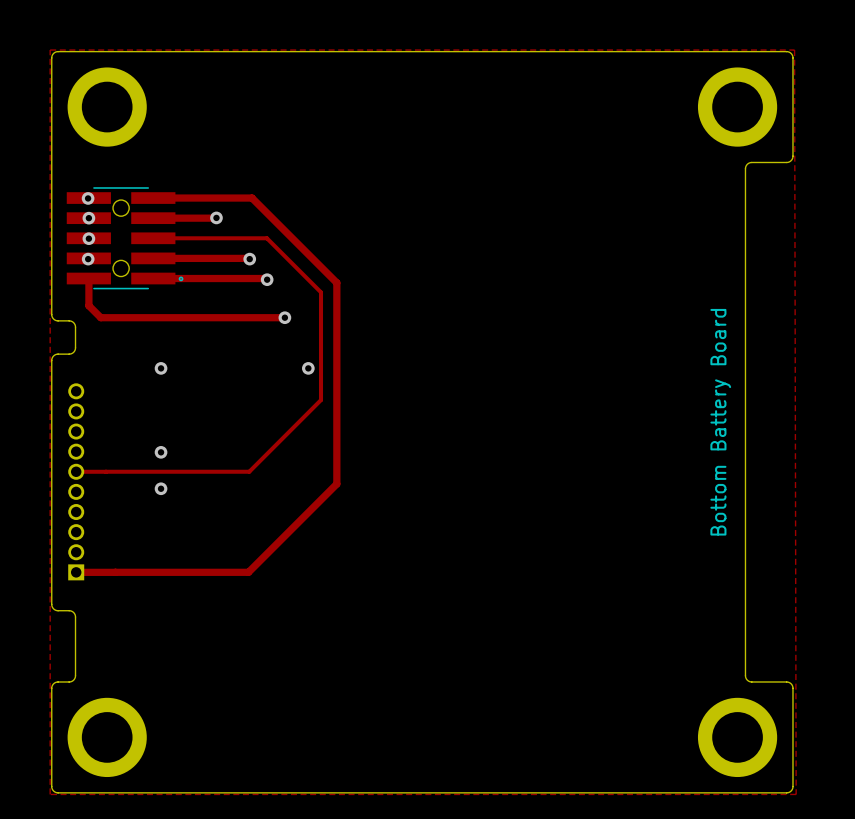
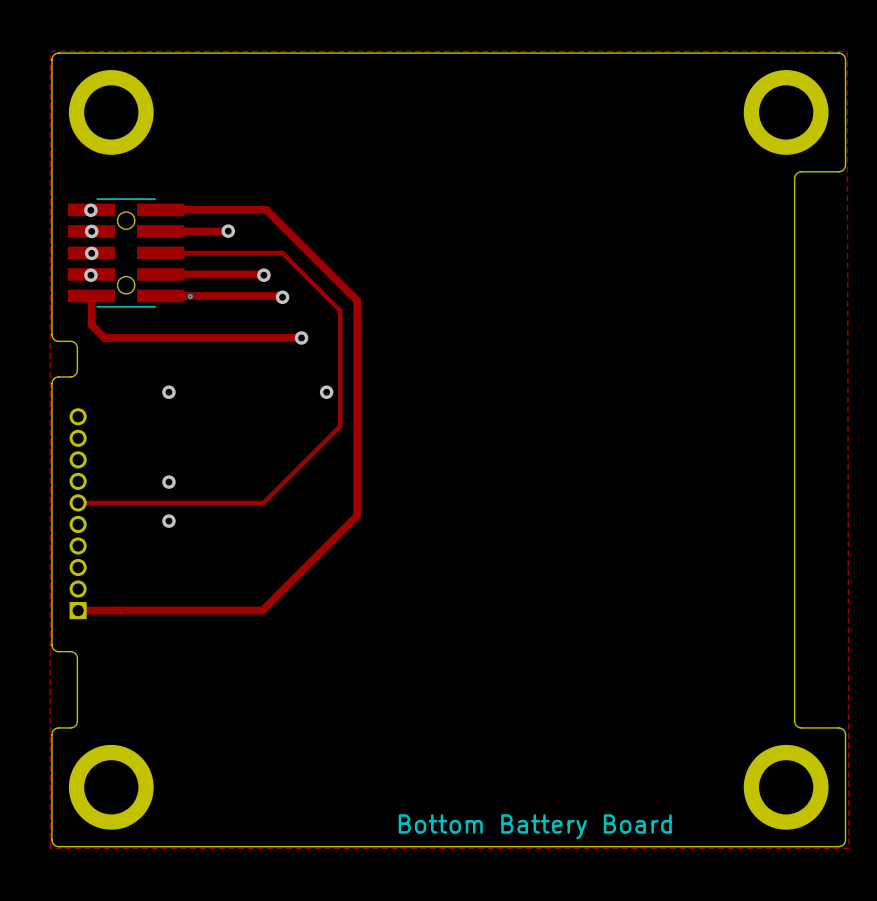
text: Bottom Battery Board (720, 422) -> none
text: none -> Bottom Battery Board (535, 826)

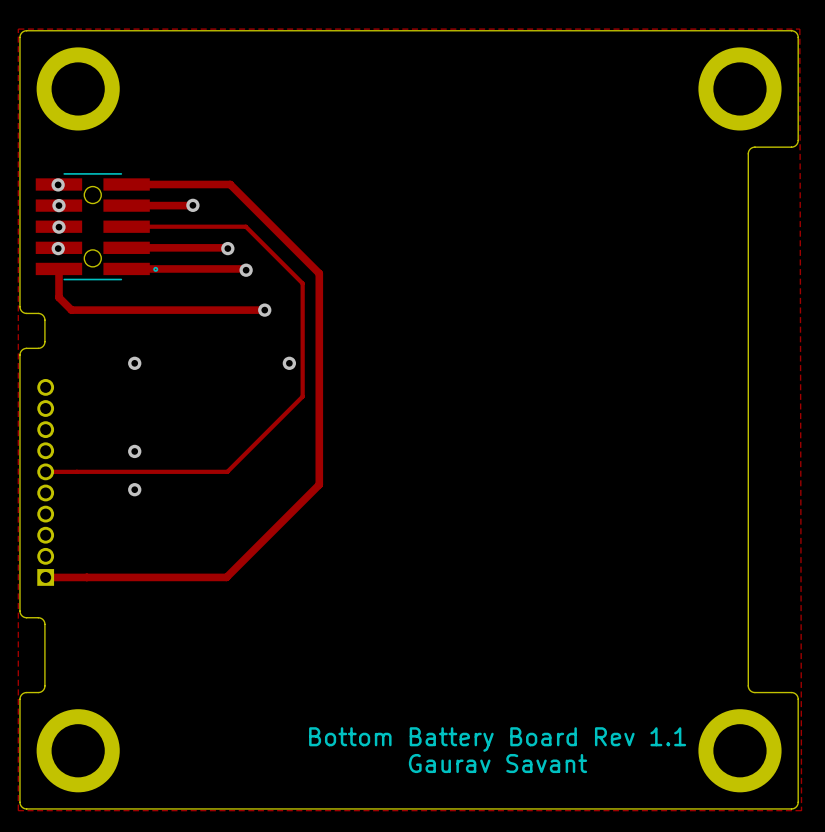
text: none -> Bottom Battery Board Rev 1.1 (497, 739)
text: none -> Gaurav Savant (498, 763)
text: Bottom Battery Board (535, 826) -> none

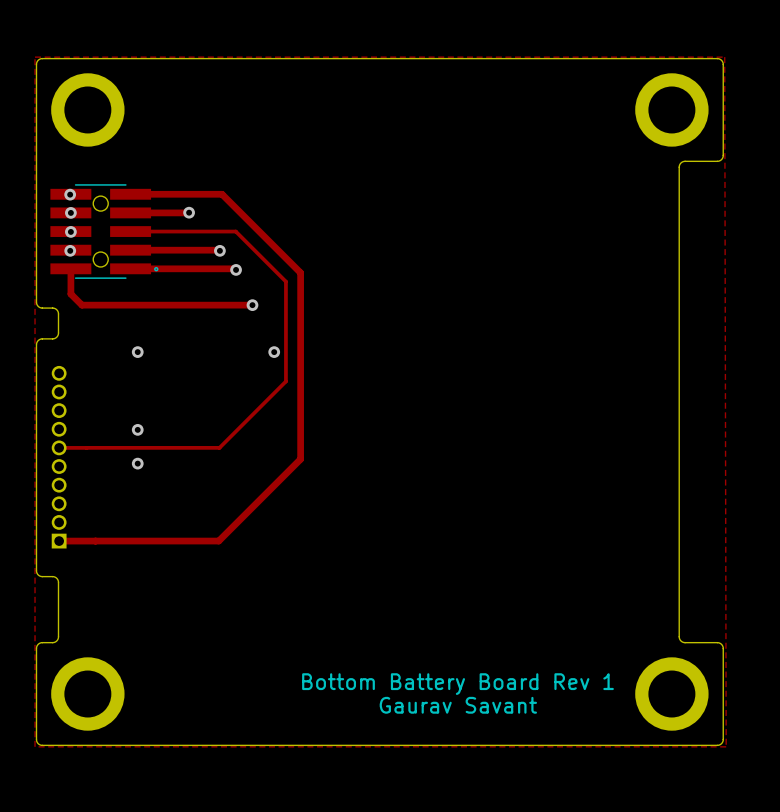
text: Bottom Battery Board Rev 1.1 (497, 739) -> Bottom Battery Board Rev 1 (457, 684)

